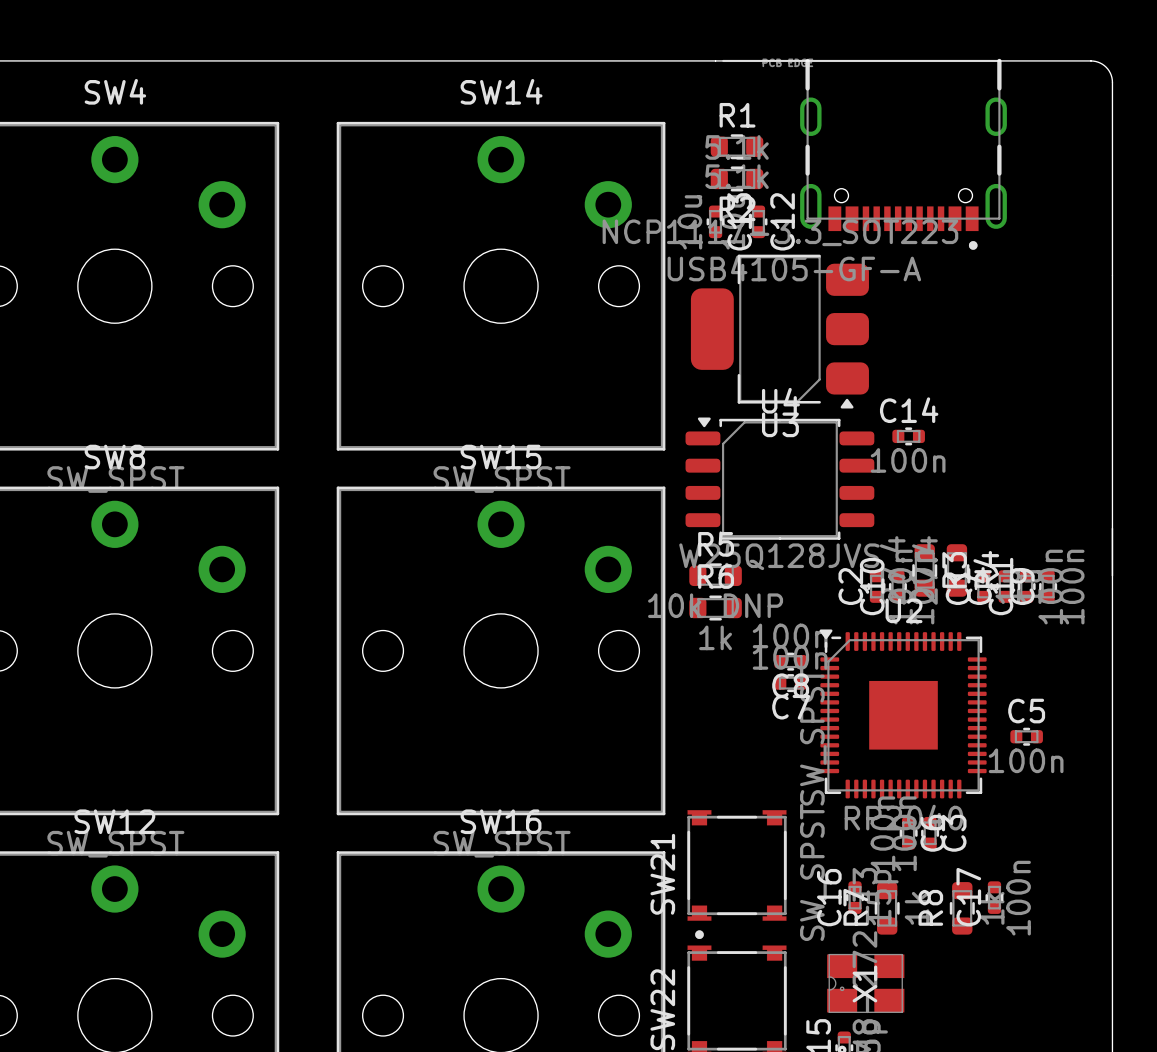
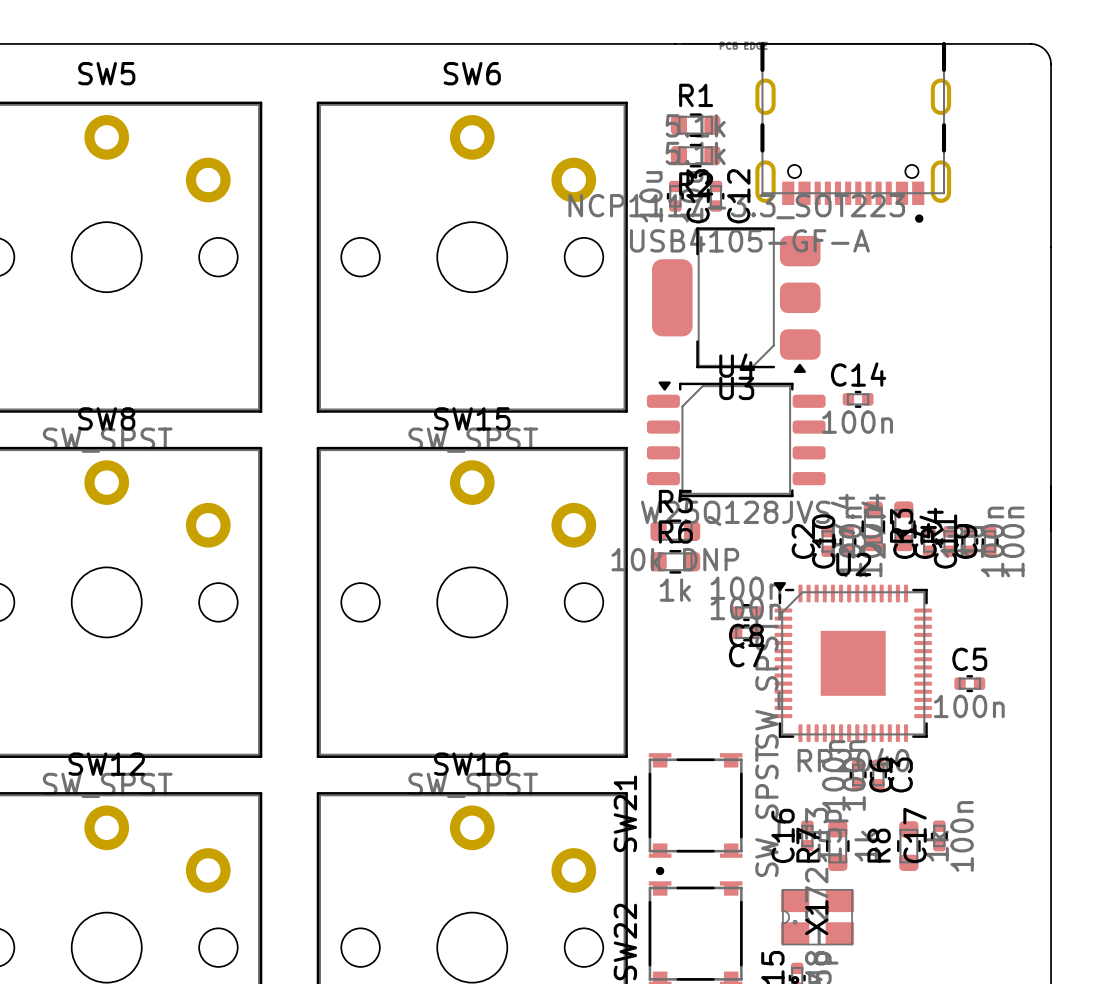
SW4 name: SW4 (115, 91) -> SW5 (106, 73)
SW14 name: SW14 (501, 91) -> SW6 (472, 73)

